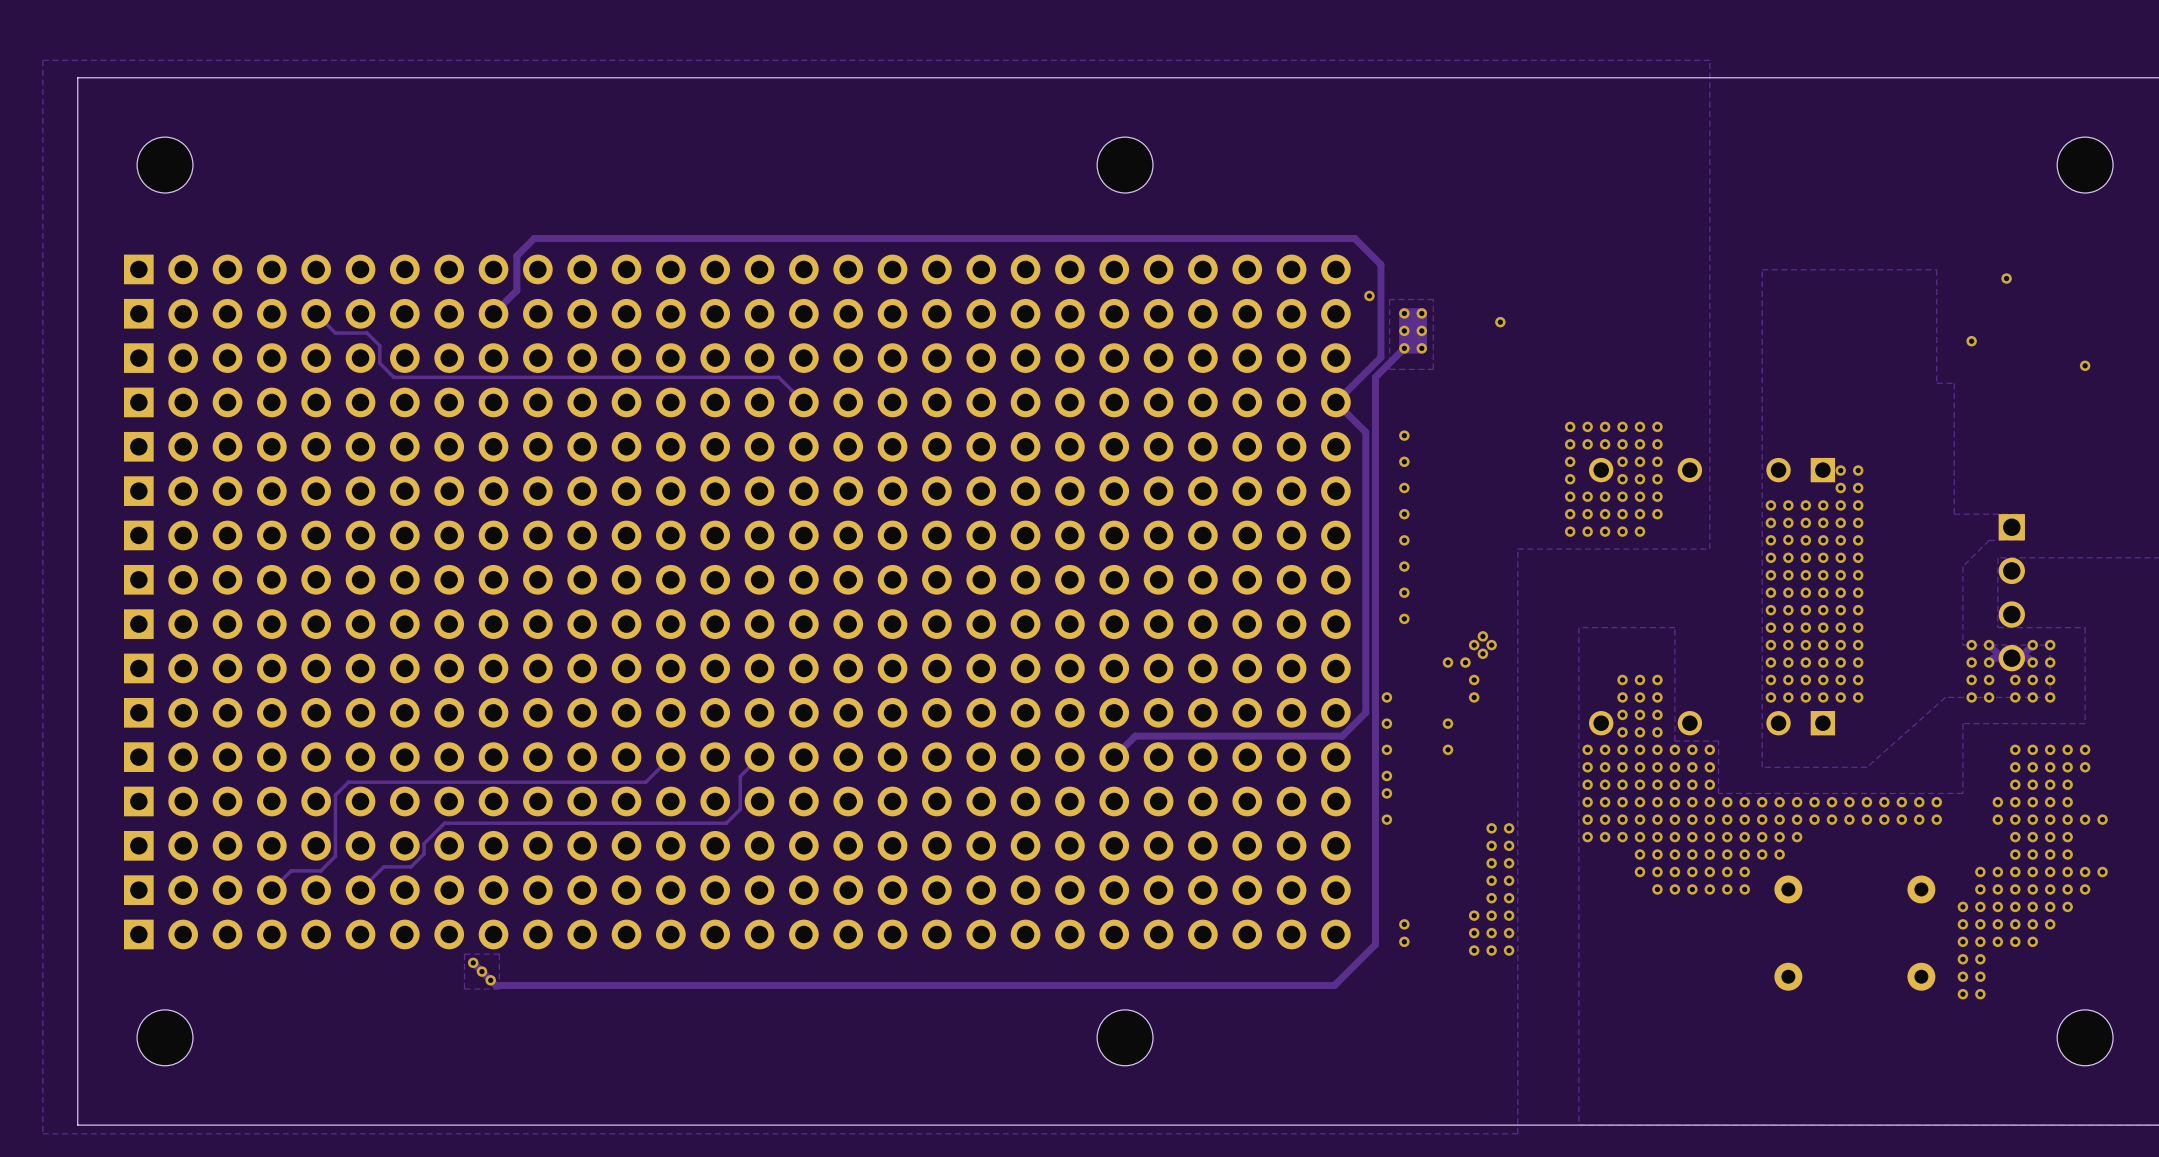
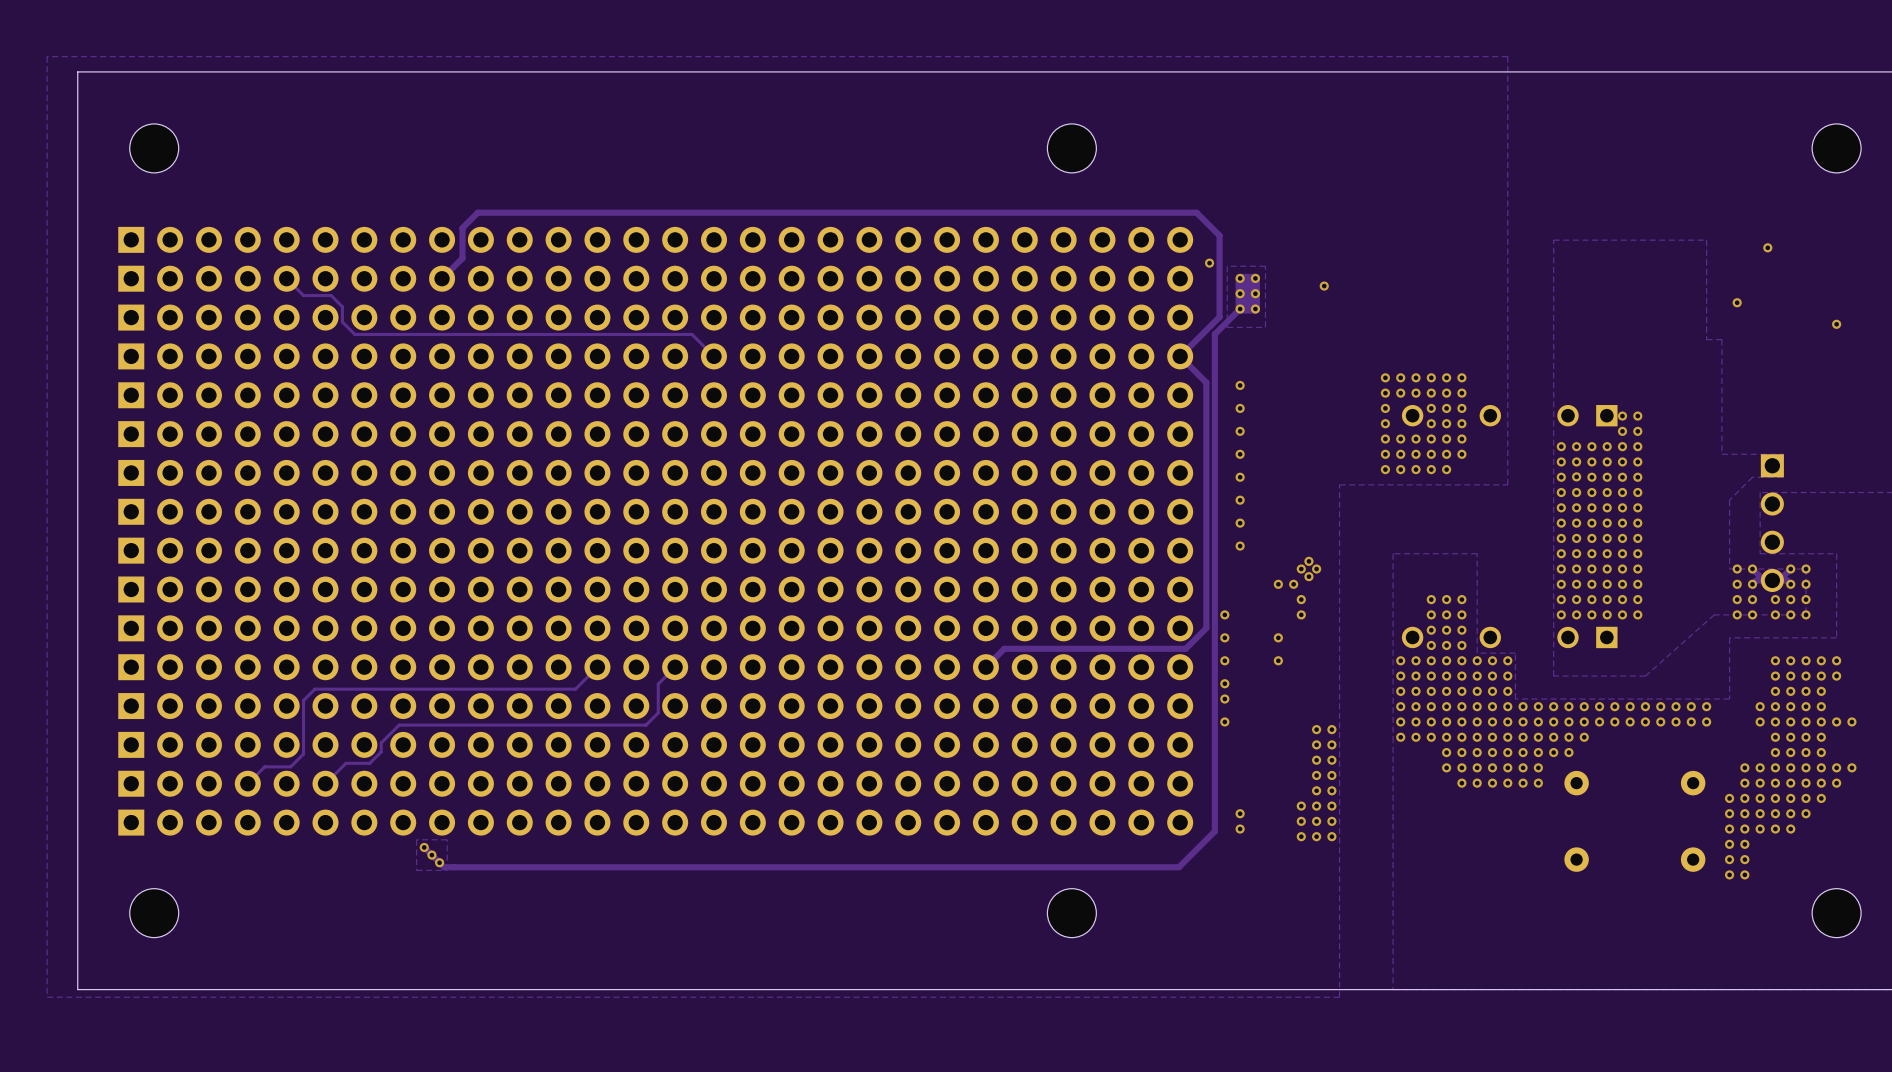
part position: (1125, 165) -> (1071, 148)
part position: (1125, 1037) -> (1071, 913)

